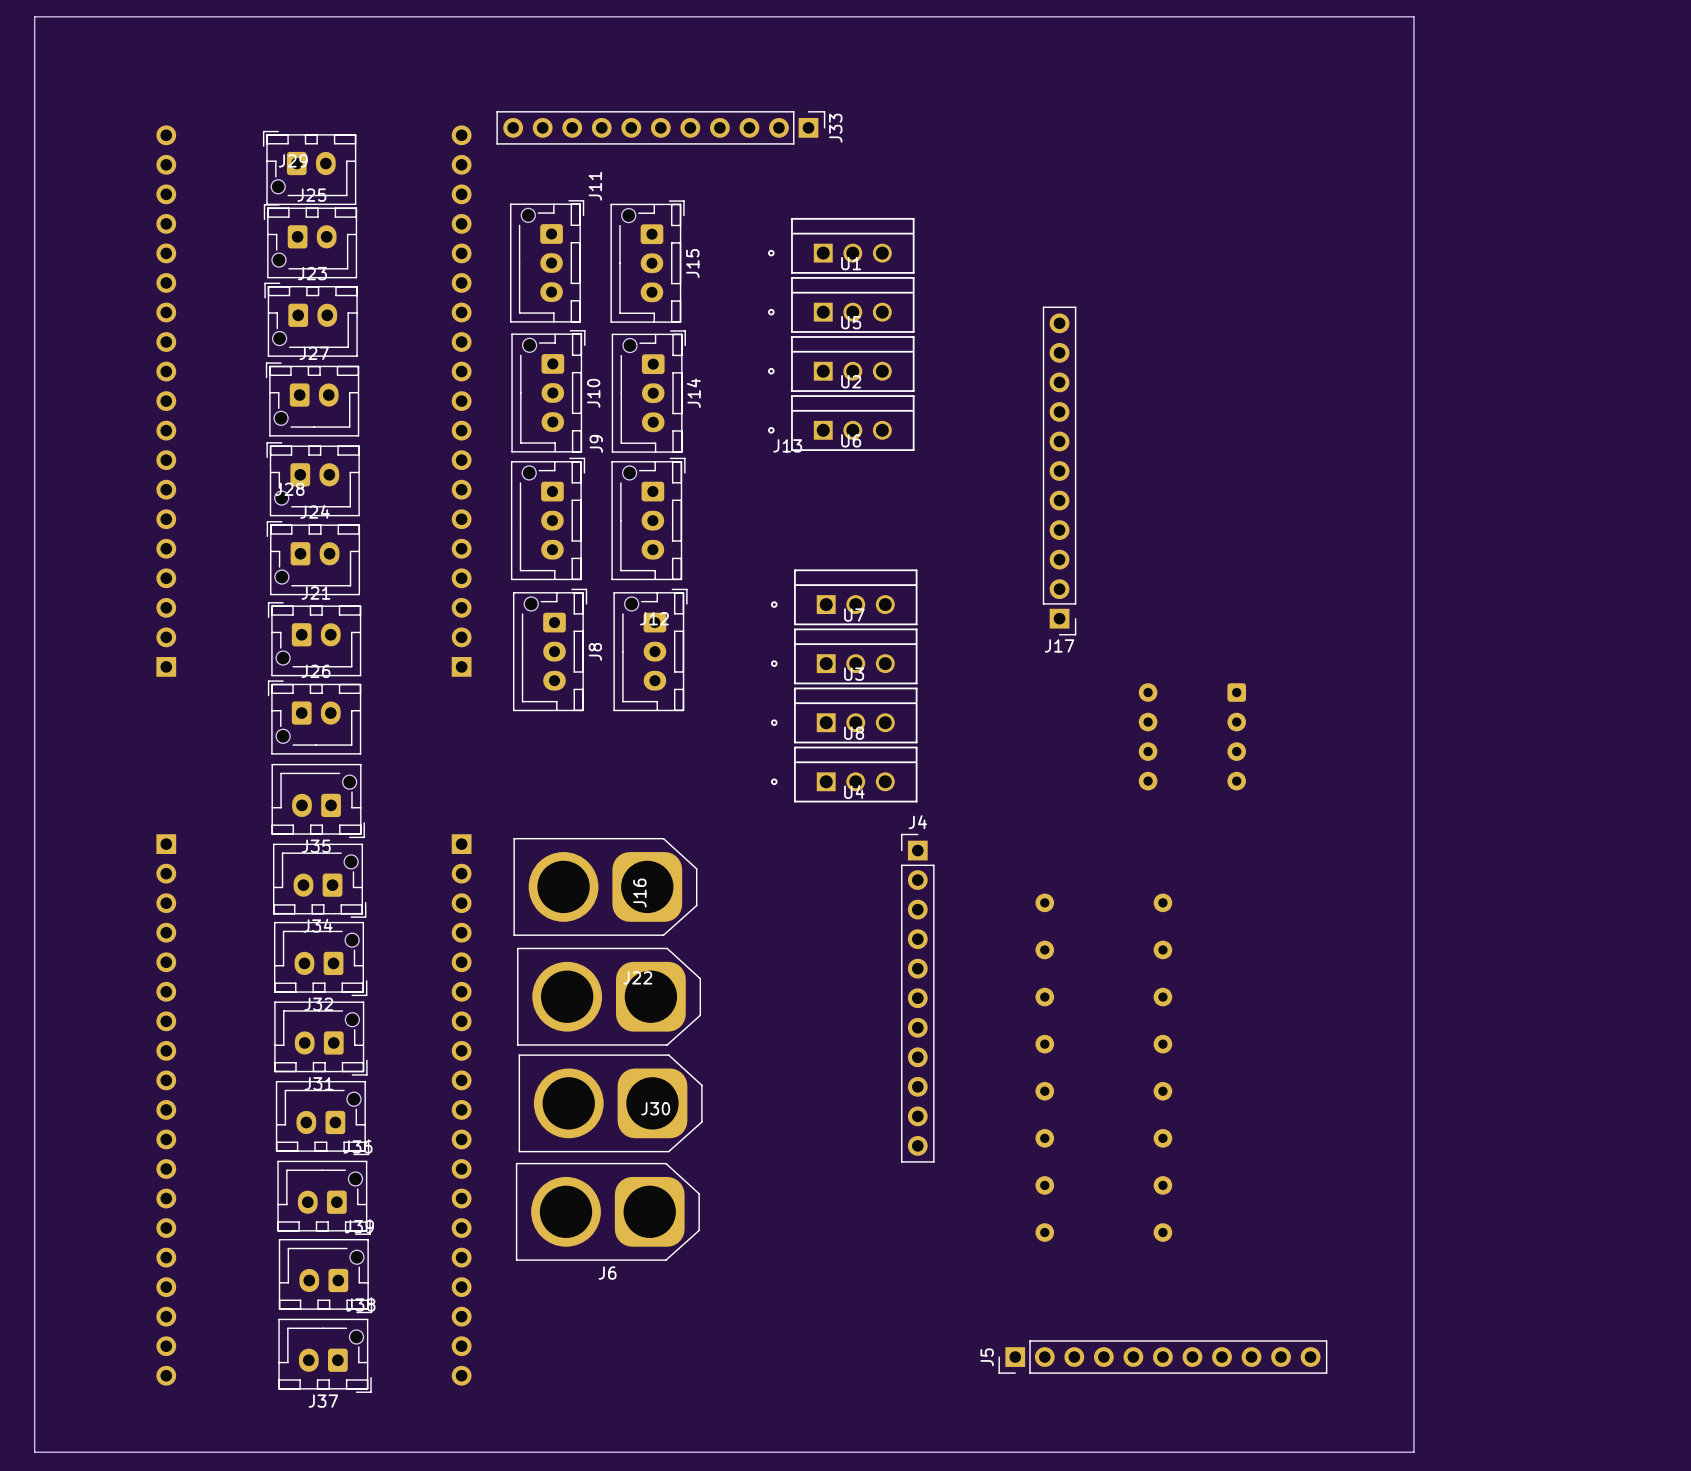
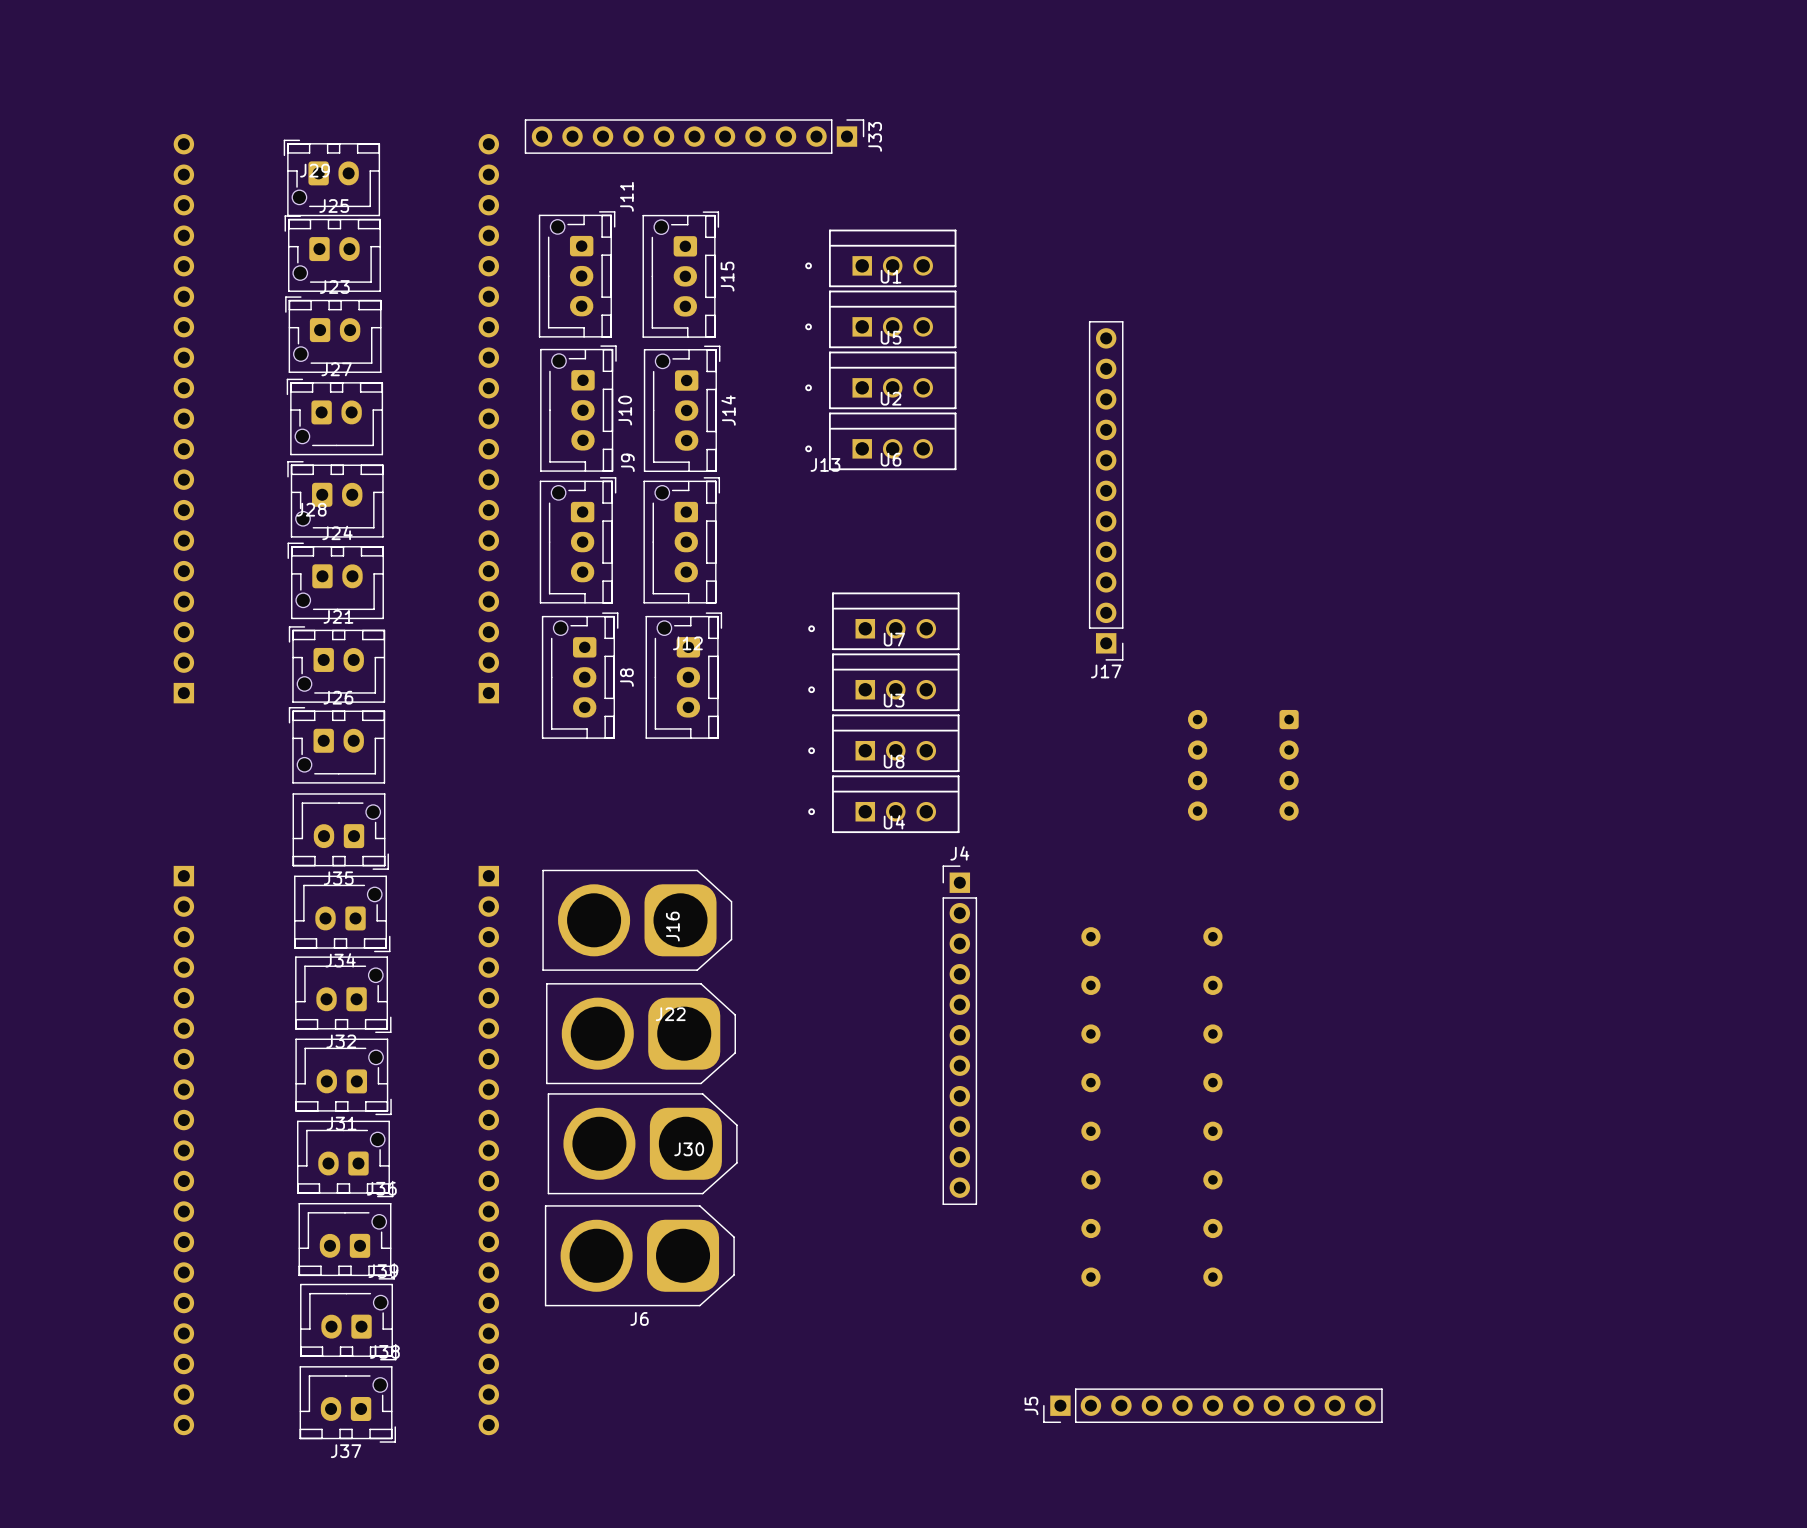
board edge: (34, 16) (1413, 16) (1413, 1452) (34, 1452) (34, 16) -> none

